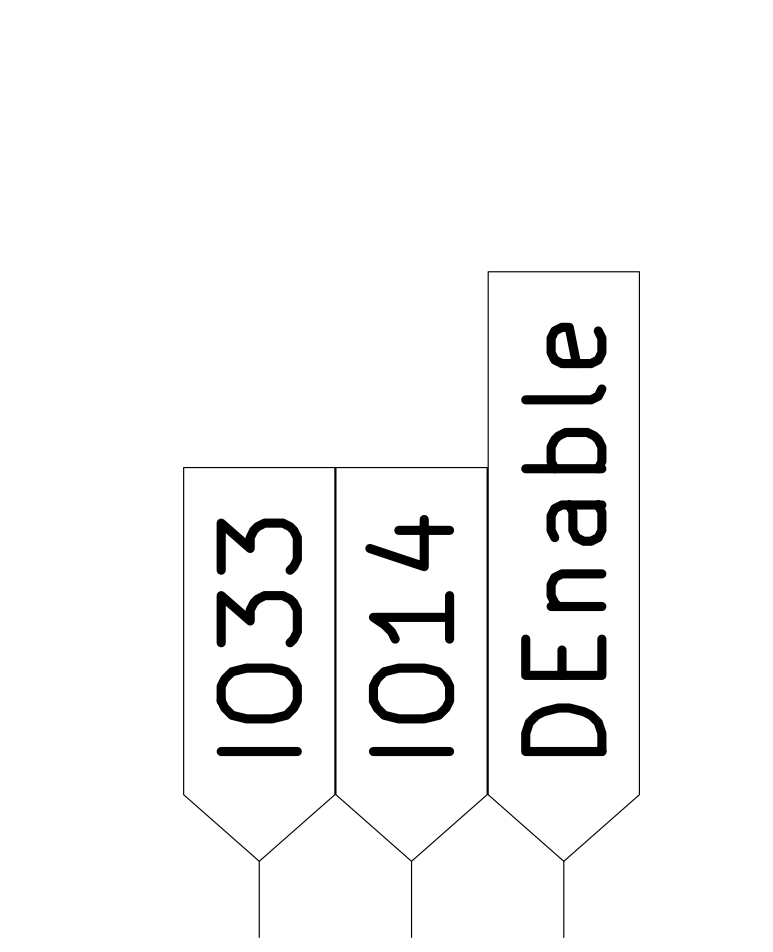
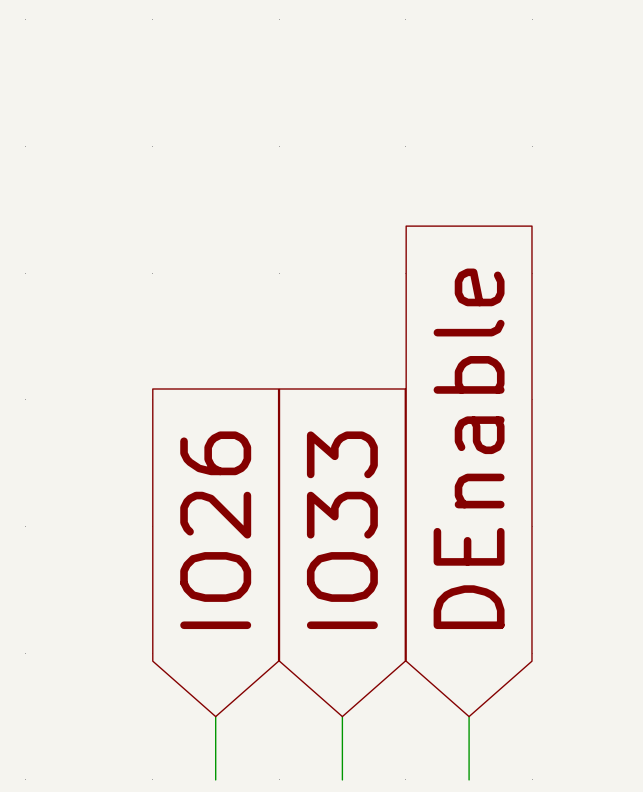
global label: IO14 (409, 635) -> IO33 (342, 530)
global label: IO33 (259, 637) -> IO26 (215, 530)

